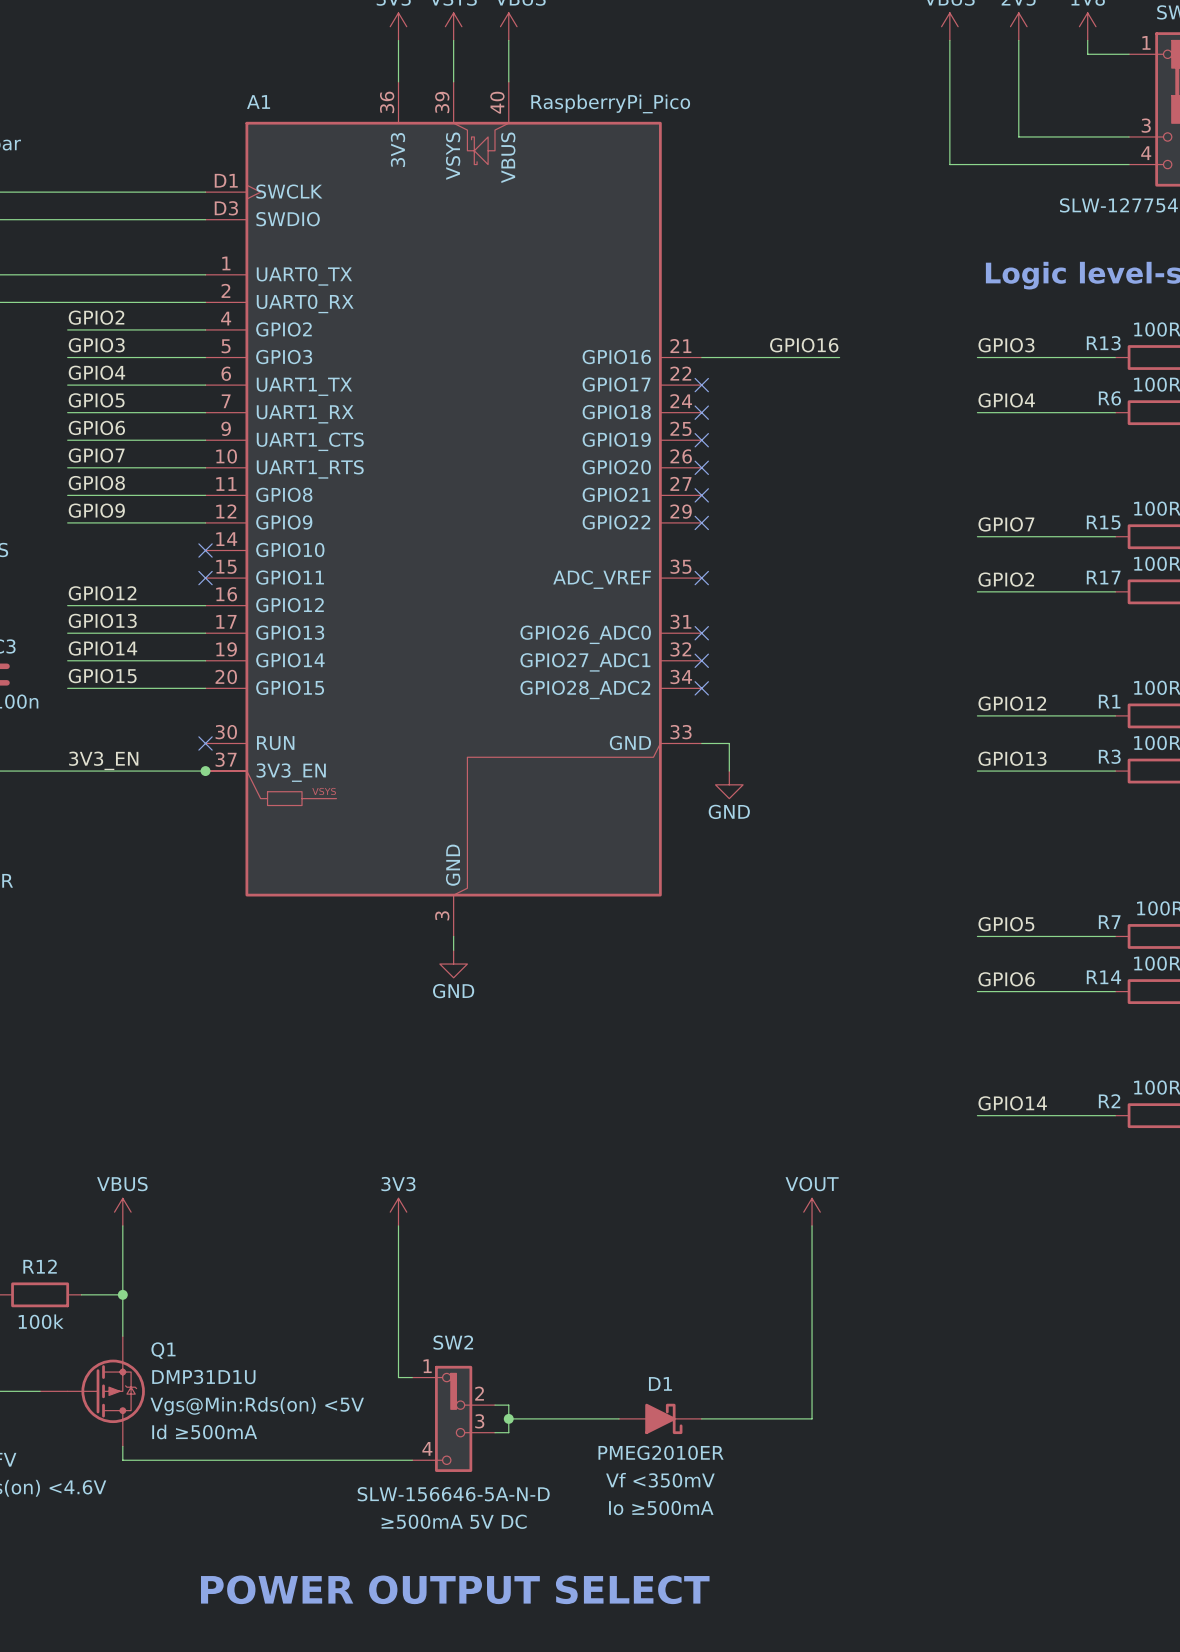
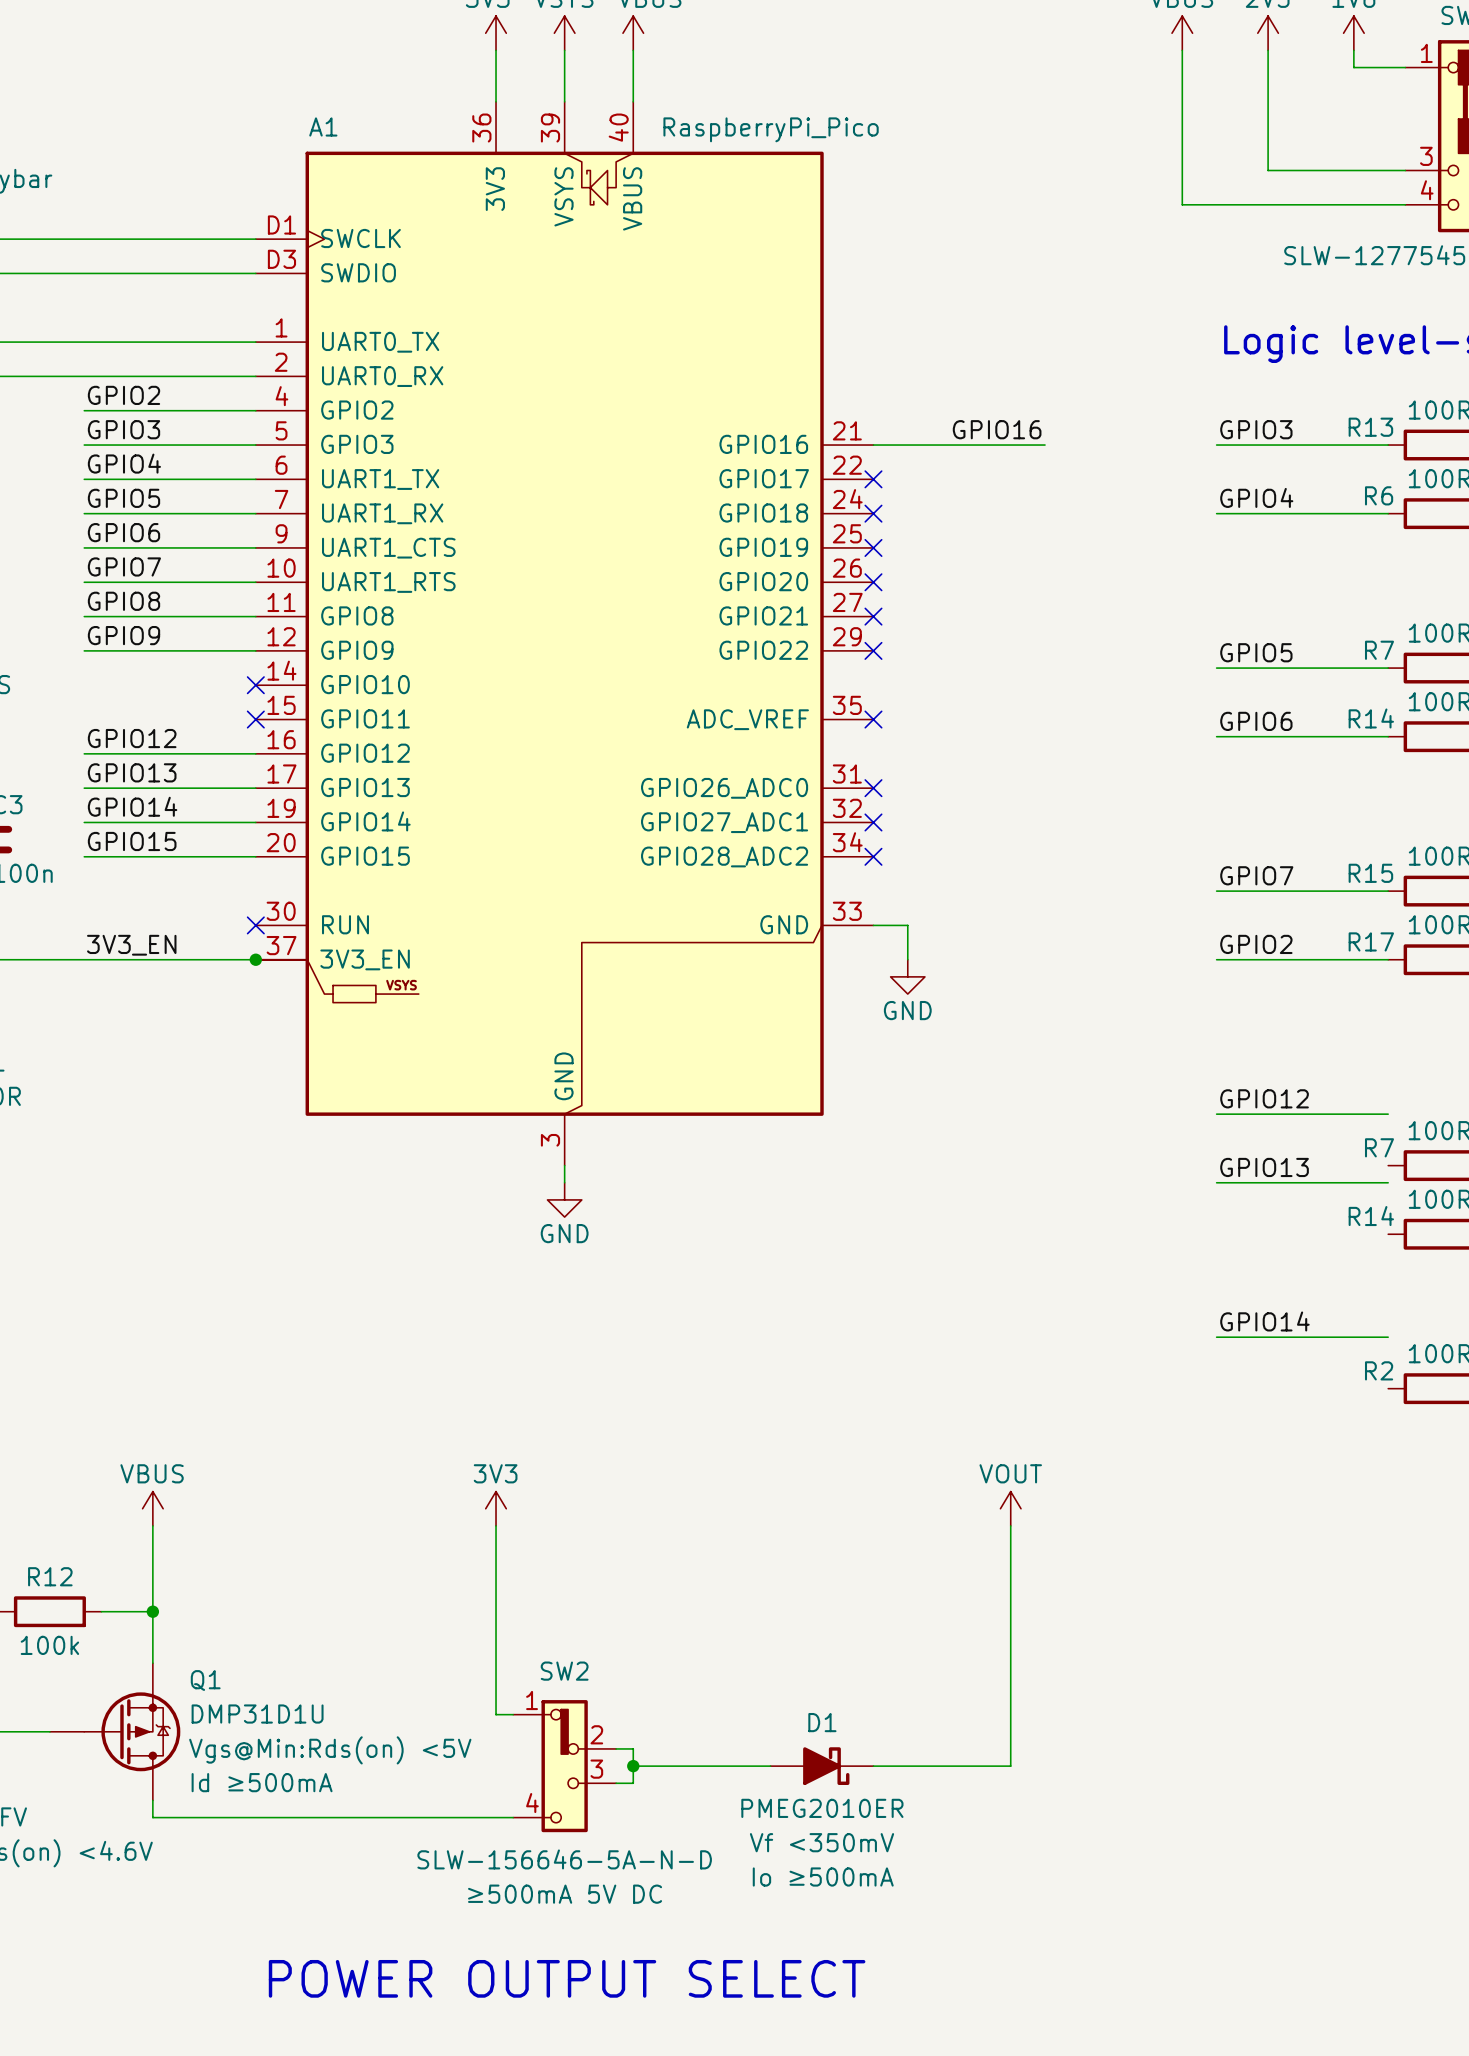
R15 name: R15 (1103, 522) -> R7 (1379, 650)
label: GPIO7 (1006, 524) -> GPIO5 (1256, 652)
R17 name: R17 (1103, 577) -> R14 (1371, 718)
label: GPIO2 (1006, 579) -> GPIO6 (1256, 721)
R1 name: R1 (1109, 701) -> R15 (1370, 873)
label: GPIO12 (1012, 703) -> GPIO7 (1256, 875)
R3 name: R3 (1109, 756) -> R17 (1371, 941)
label: GPIO13 (1012, 758) -> GPIO2 (1256, 944)
label: none -> GPIO12 (1264, 1098)
label: GPIO5 (1006, 924) -> GPIO13 (1264, 1167)
wire: (977, 936) (1115, 936) -> (1216, 1114) (1388, 1114)
label: GPIO6 (1006, 979) -> none
wire: (977, 991) (1115, 991) -> (1216, 1182) (1388, 1182)
label position: GPIO14 (1012, 1103) -> GPIO14 (1264, 1321)
wire: (977, 1115) (1115, 1115) -> (1216, 1337) (1388, 1337)

